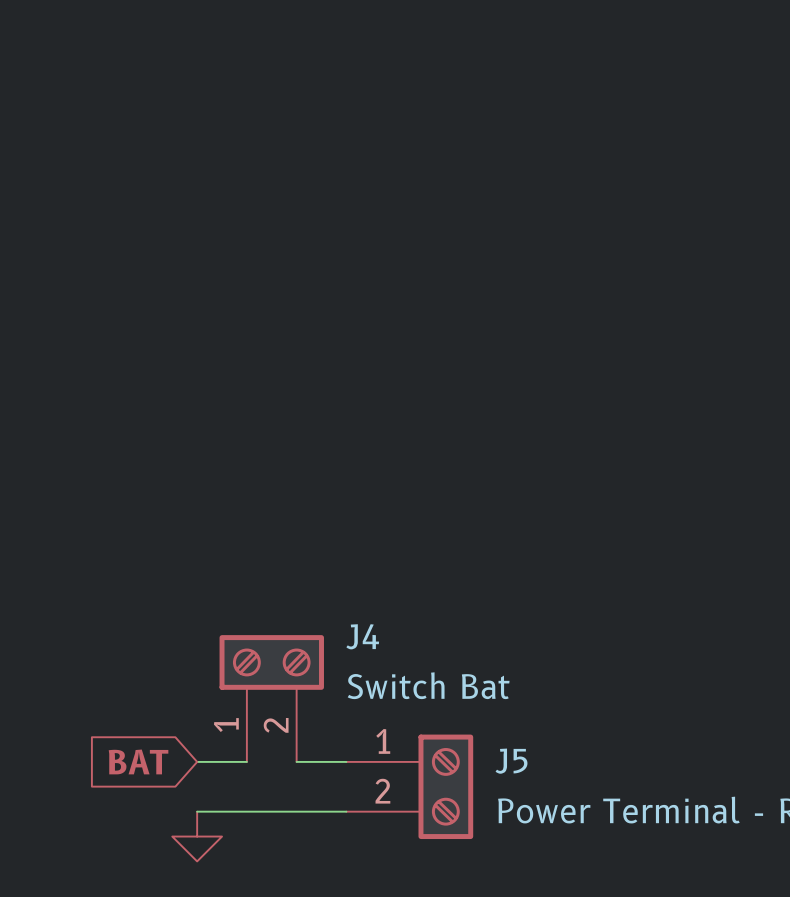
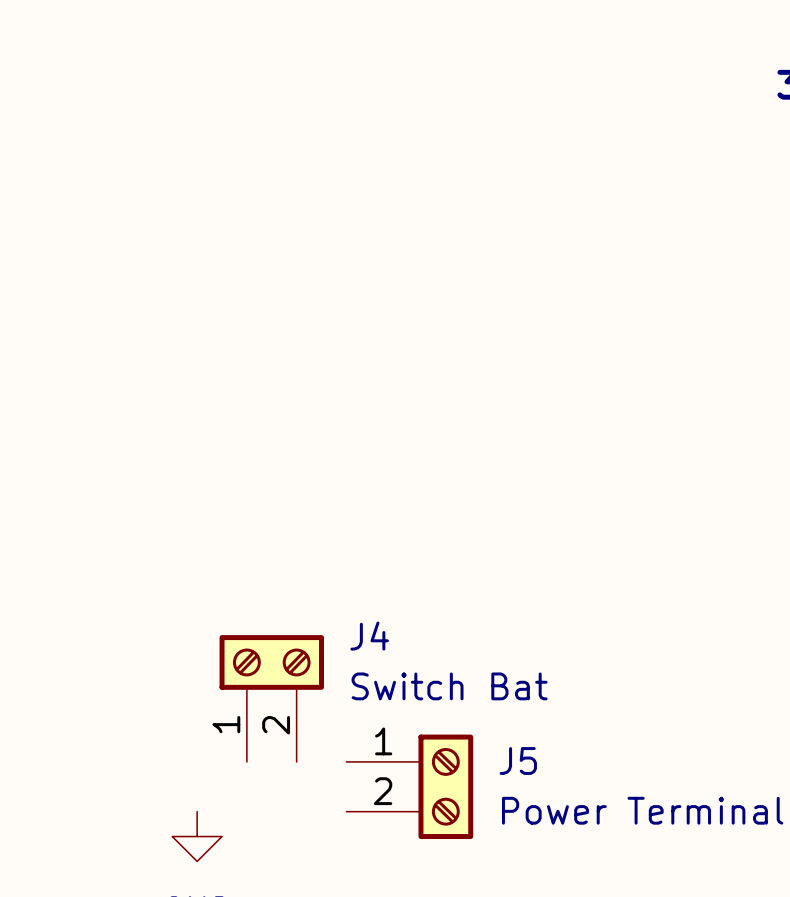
global label: BAT (138, 761) -> none
wire: (197, 761) (246, 761) -> none
wire: (296, 761) (346, 761) -> none
wire: (197, 811) (346, 811) -> none

